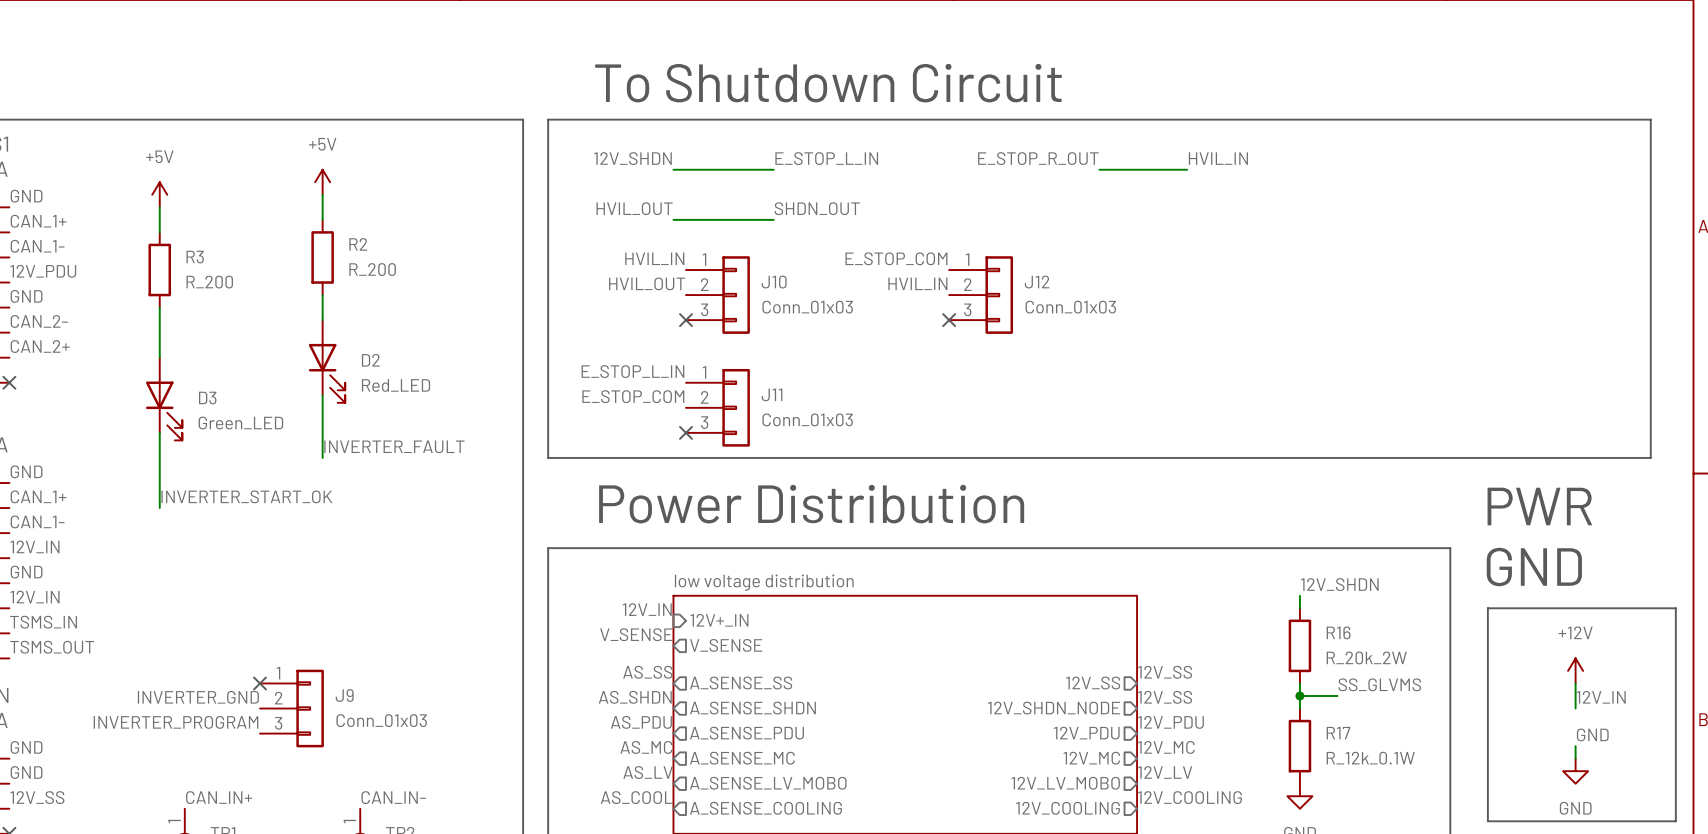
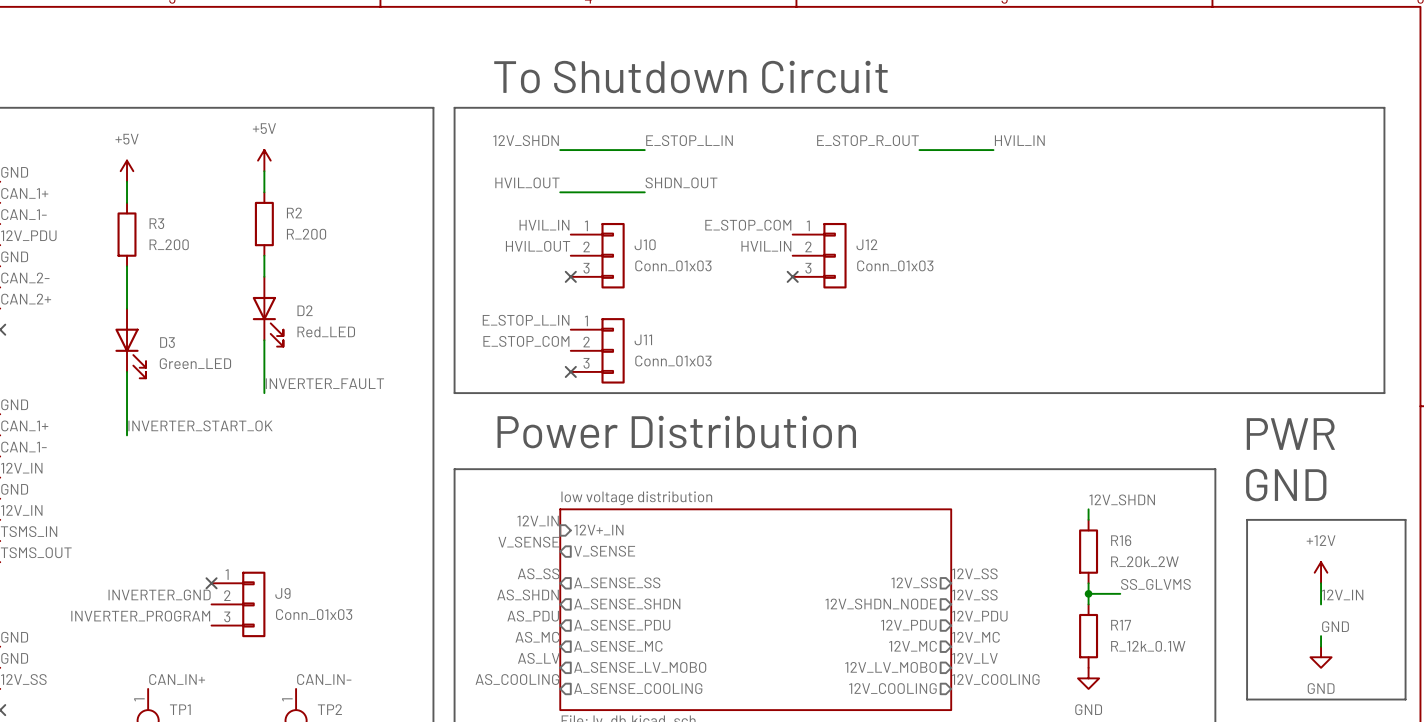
label: AS_COOL (636, 797) -> AS_COOLING (517, 679)

